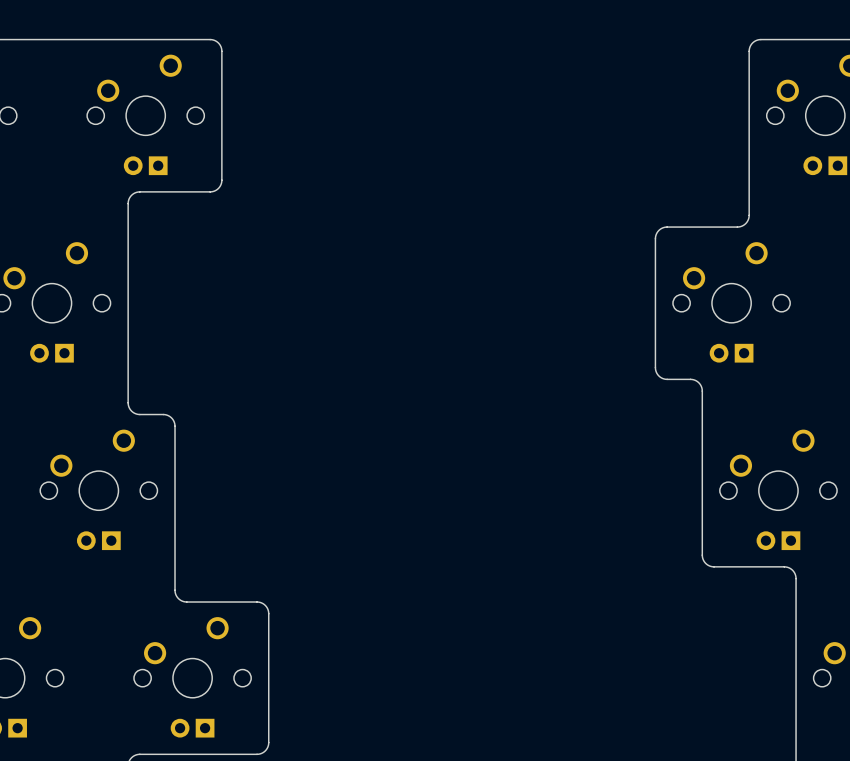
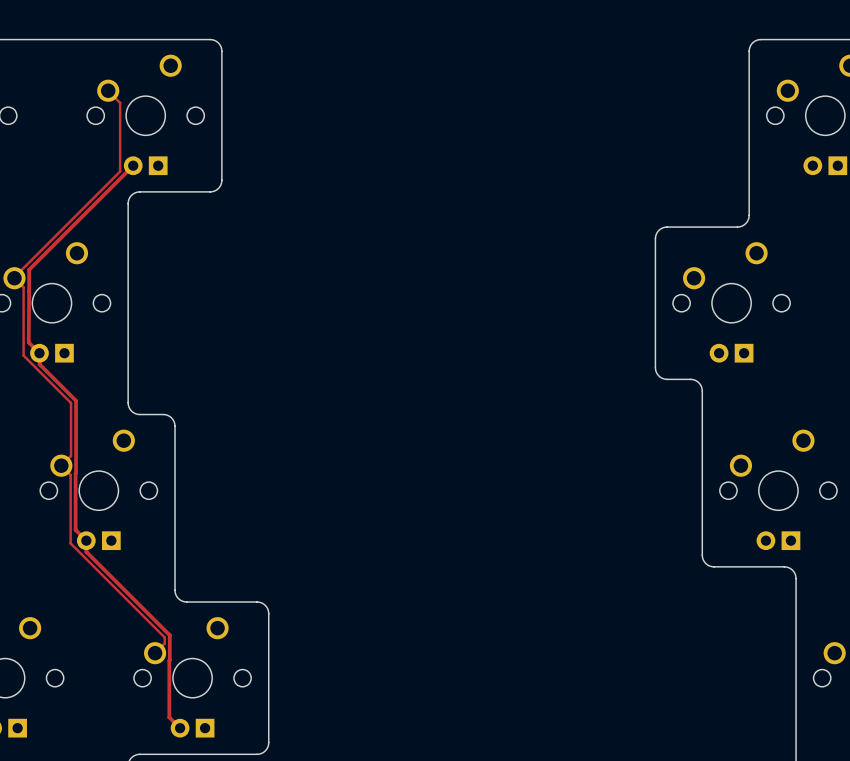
track: none -> (108, 90) (120, 102) (120, 171) (14, 278) (23, 287) (23, 355) (71, 402) (71, 455) (61, 465) (70, 474) (70, 543) (164, 637) (164, 643) (155, 653)
track: none -> (133, 165) (29, 269) (28, 342) (39, 353) (39, 364) (76, 400) (75, 529) (86, 540) (86, 551) (169, 635) (169, 717) (180, 728)

